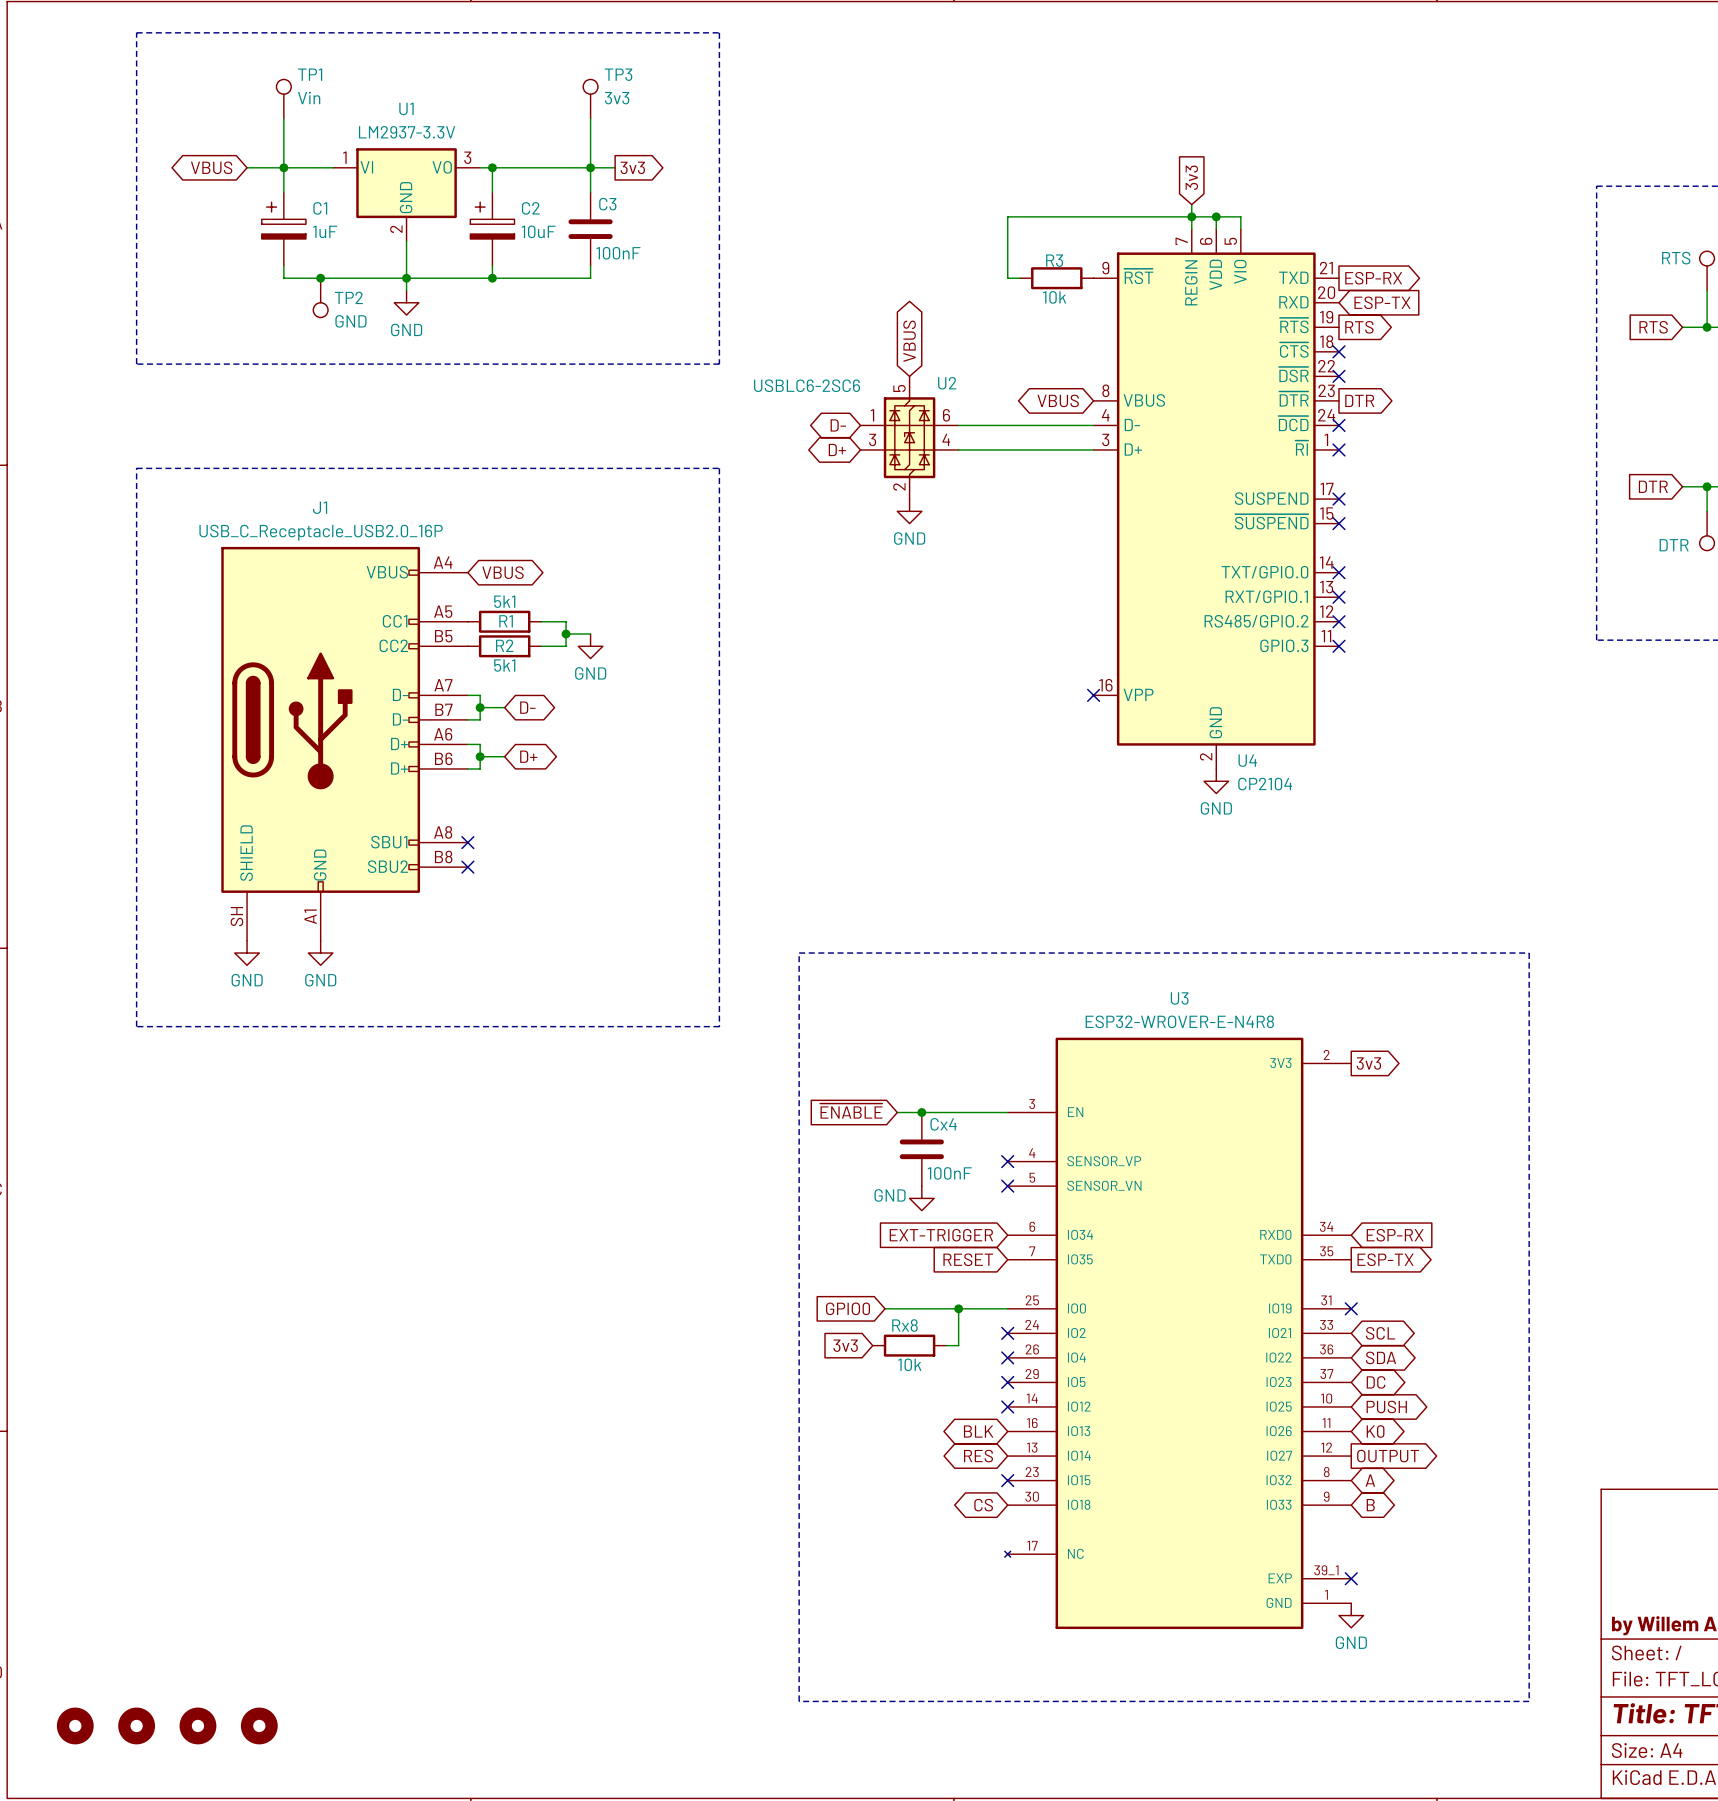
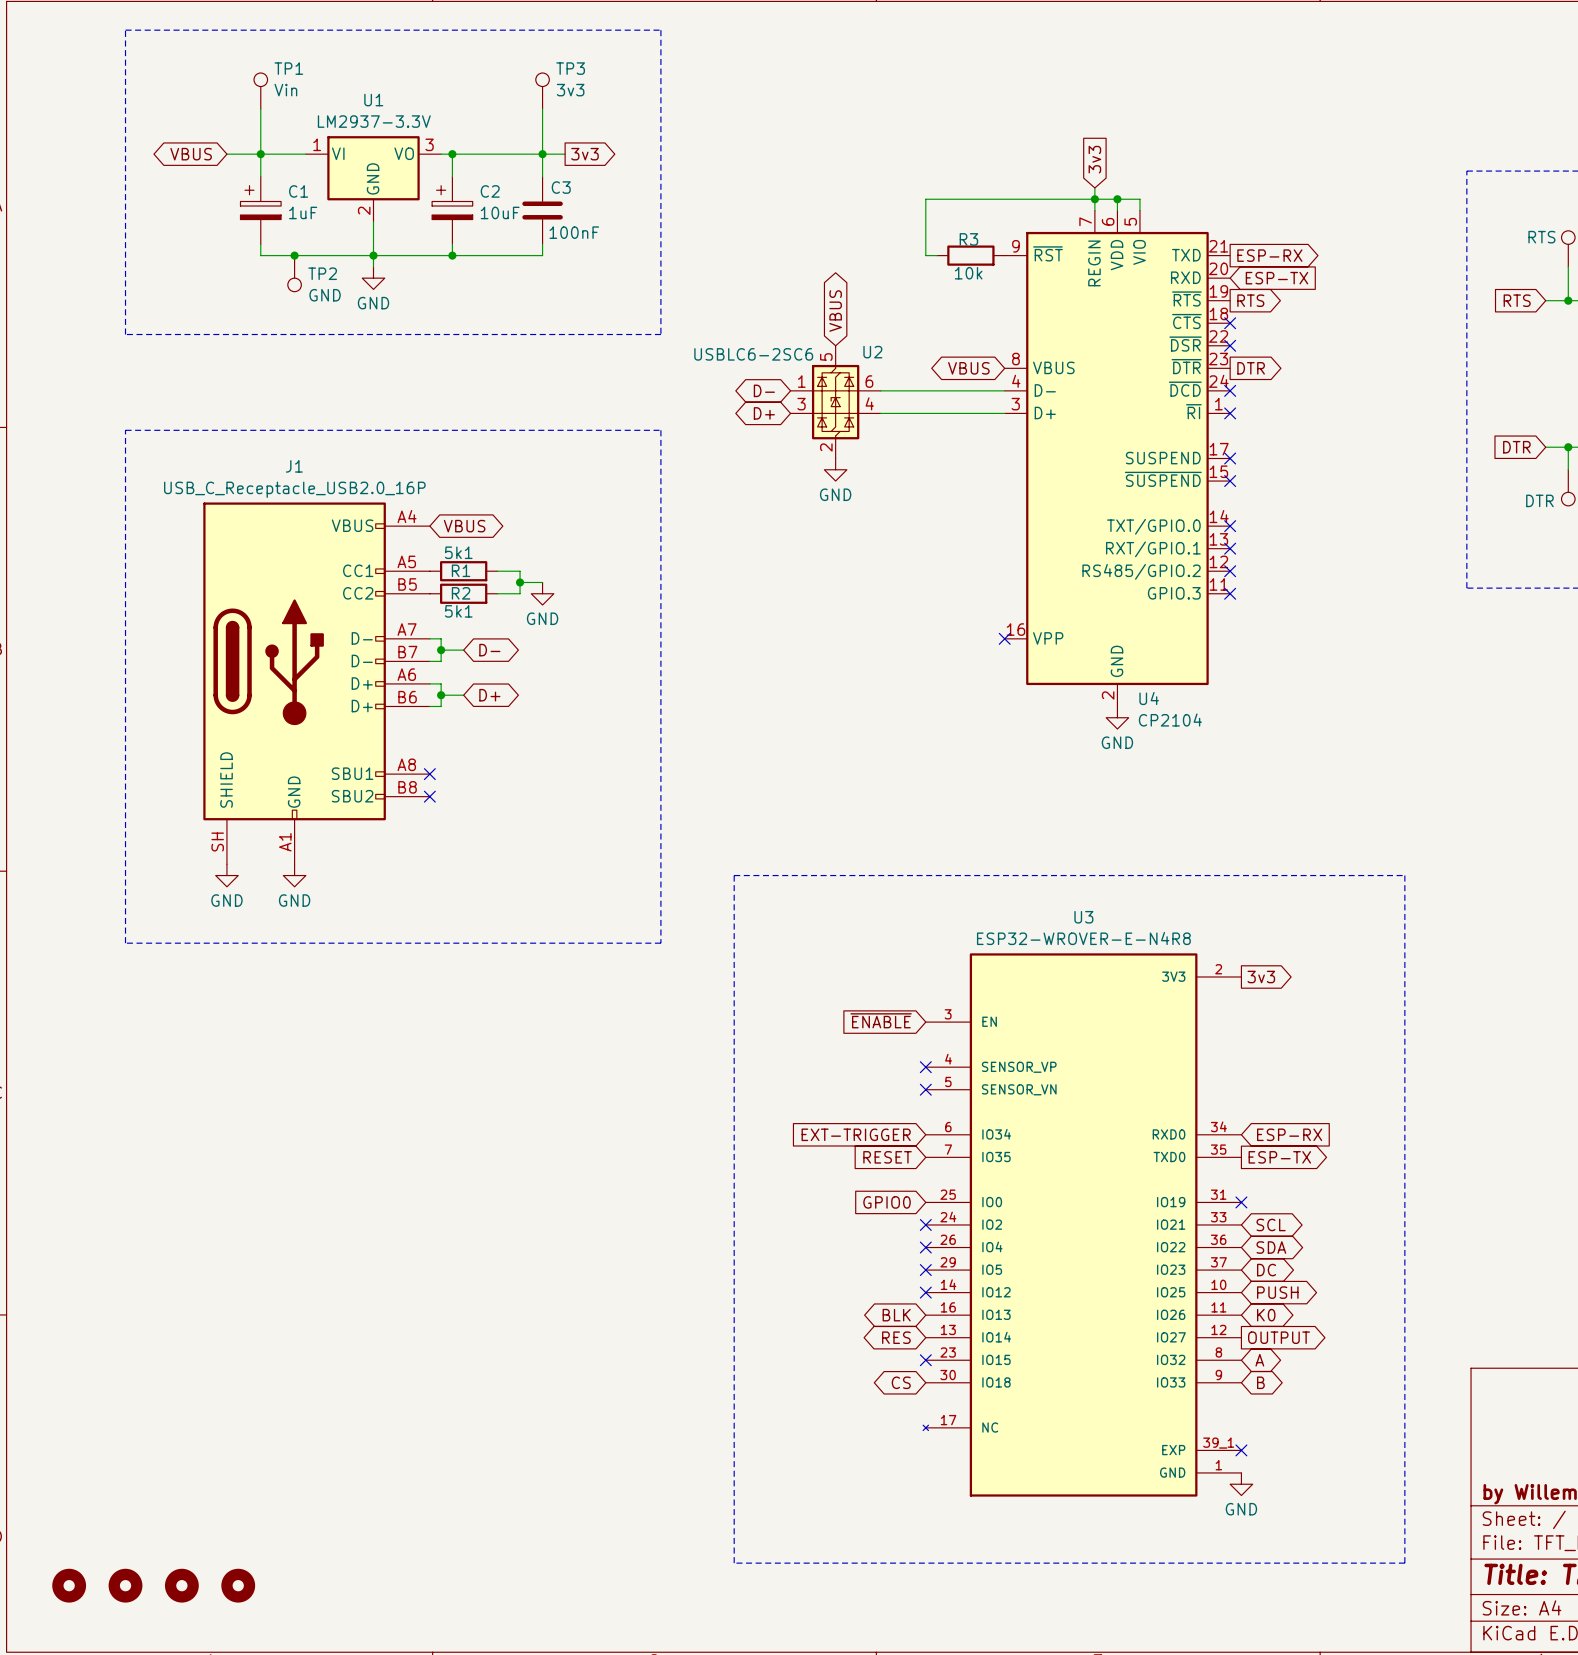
global label position: ~{ENABLE} (851, 1111) -> ~{ENABLE} (881, 1020)
wire: (897, 1112) (1007, 1112) -> none
junction: (921, 1112) -> none
Cx4: 100nF (921, 1149) -> none
power symbol: GND (921, 1198) -> none
global label position: GPIO0 (848, 1308) -> GPIO0 (887, 1202)
wire: (885, 1308) (1007, 1308) -> none
wire: (958, 1308) (958, 1345) (946, 1345) -> none
junction: (958, 1308) -> none
global label: 3v3 (845, 1345) -> none
Rx8: 10k (909, 1345) -> none

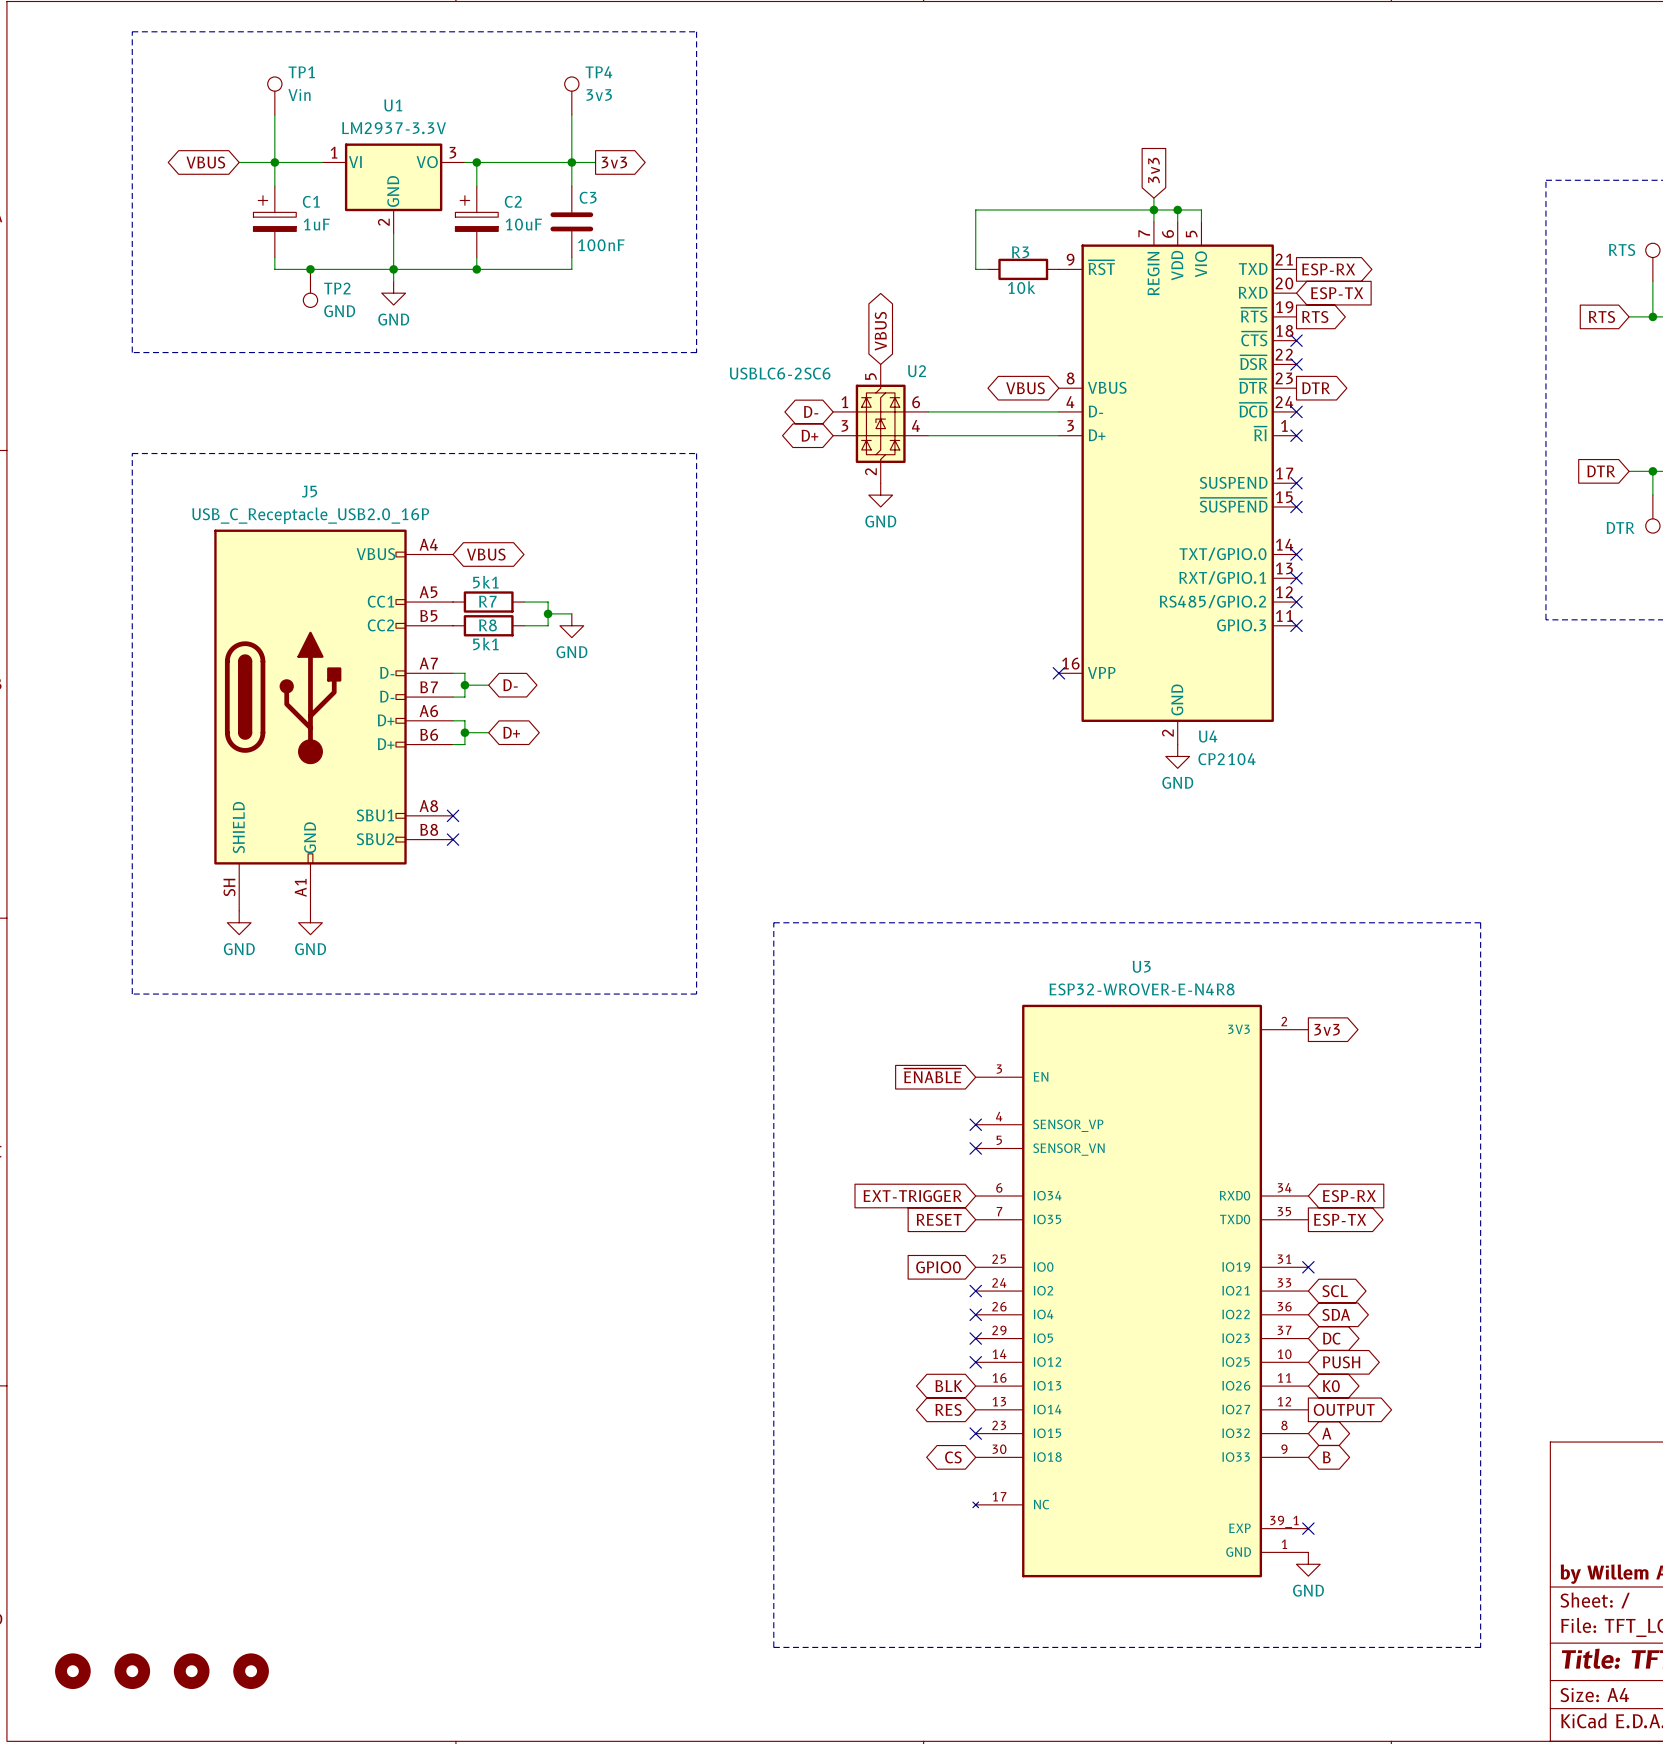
TP3 name: TP3 (570, 68) -> TP4 (598, 72)
J1 name: J1 (294, 466) -> J5 (309, 491)
R1 name: R1 (461, 570) -> R7 (487, 601)
R2 name: R2 (461, 593) -> R8 (487, 625)

